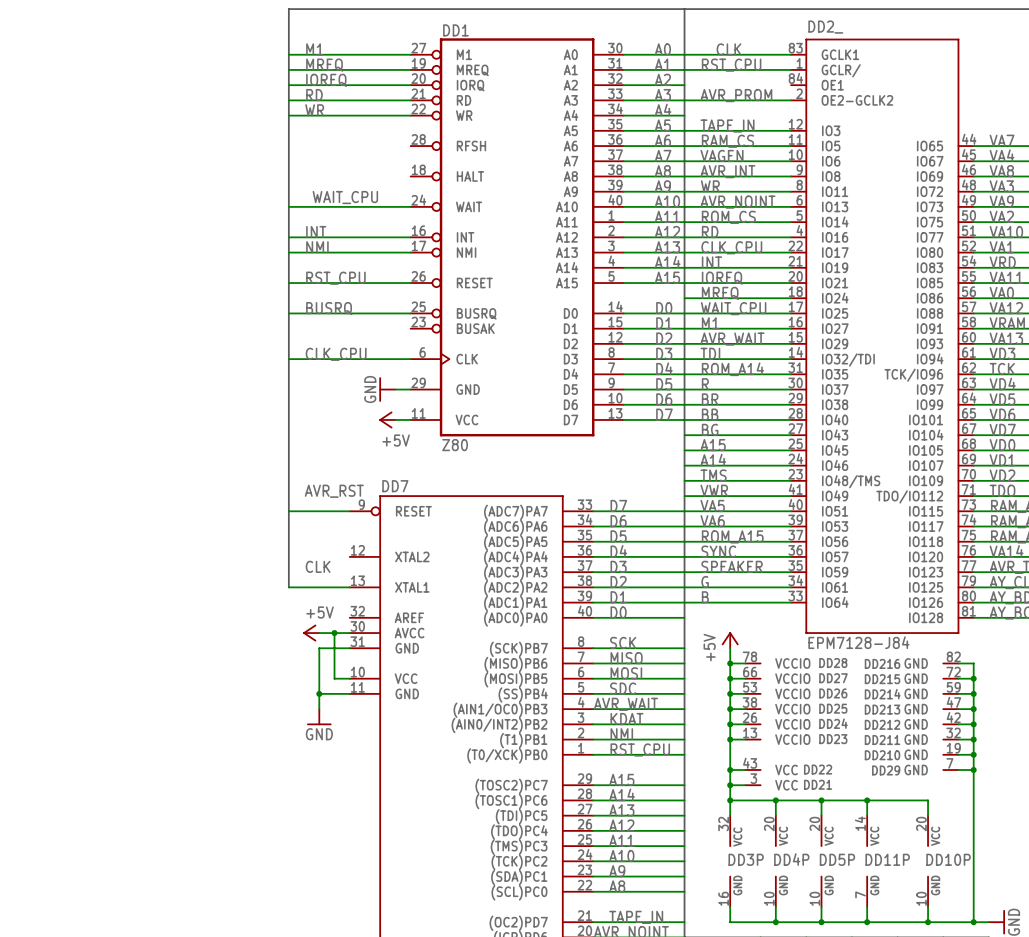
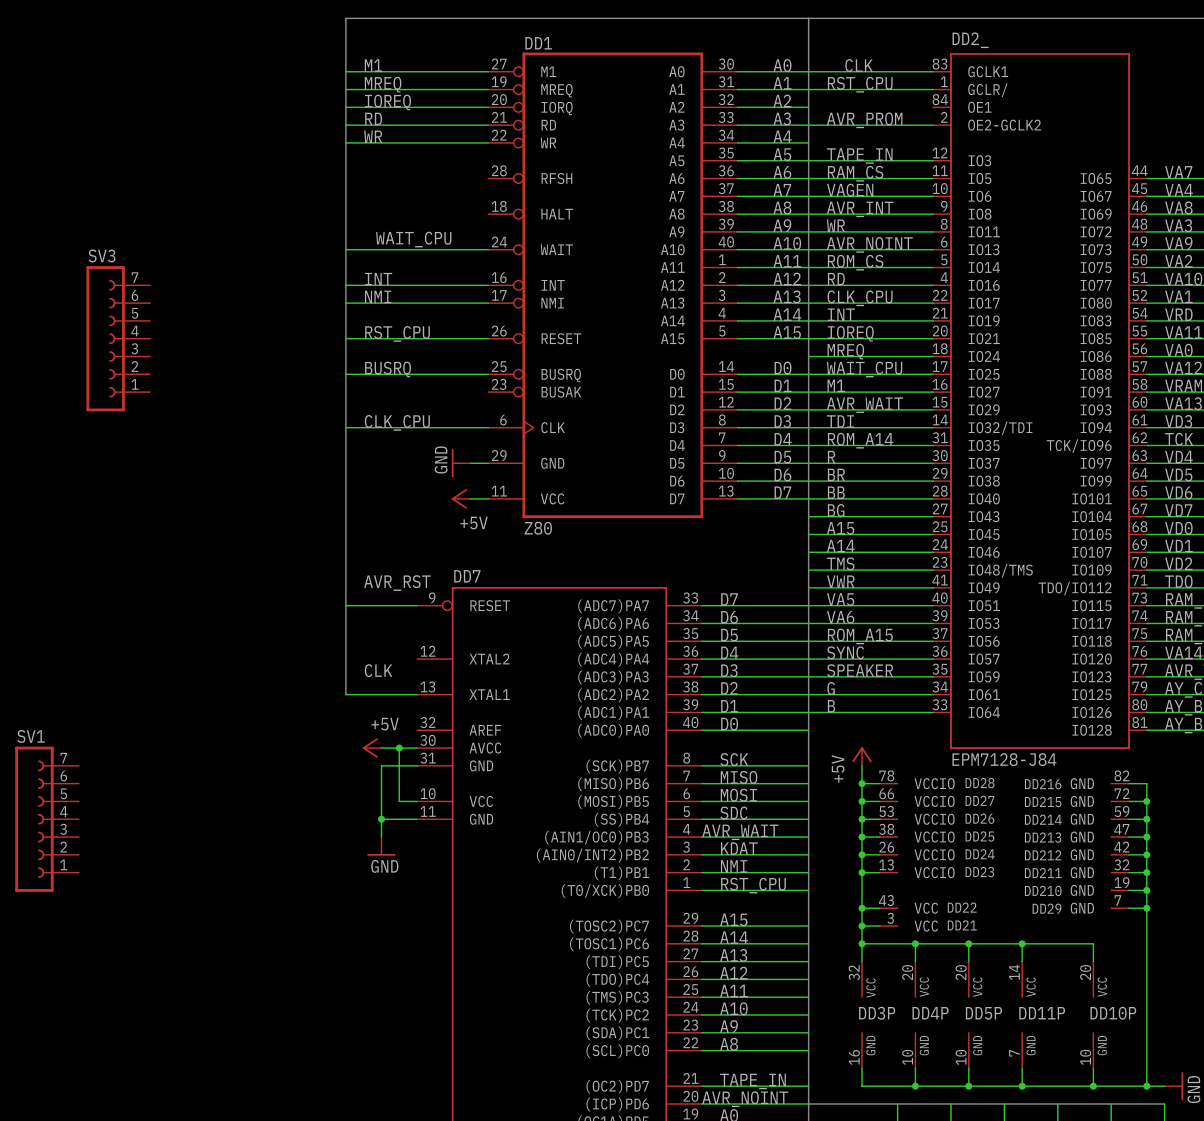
SV3: none -> (118, 338)
SV1: none -> (47, 819)

